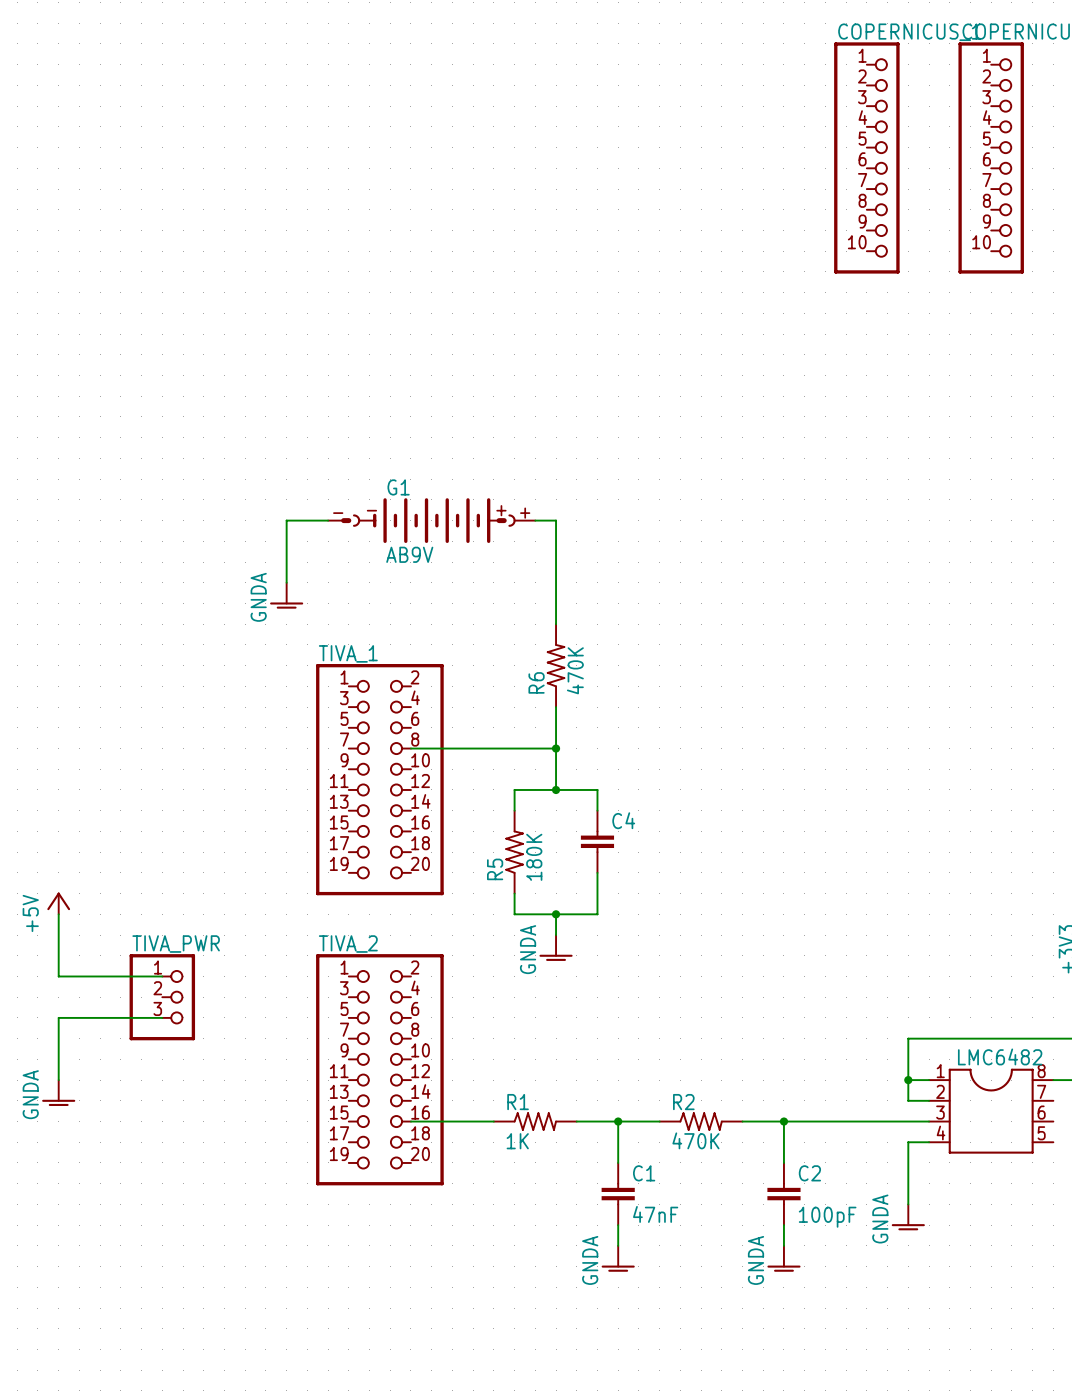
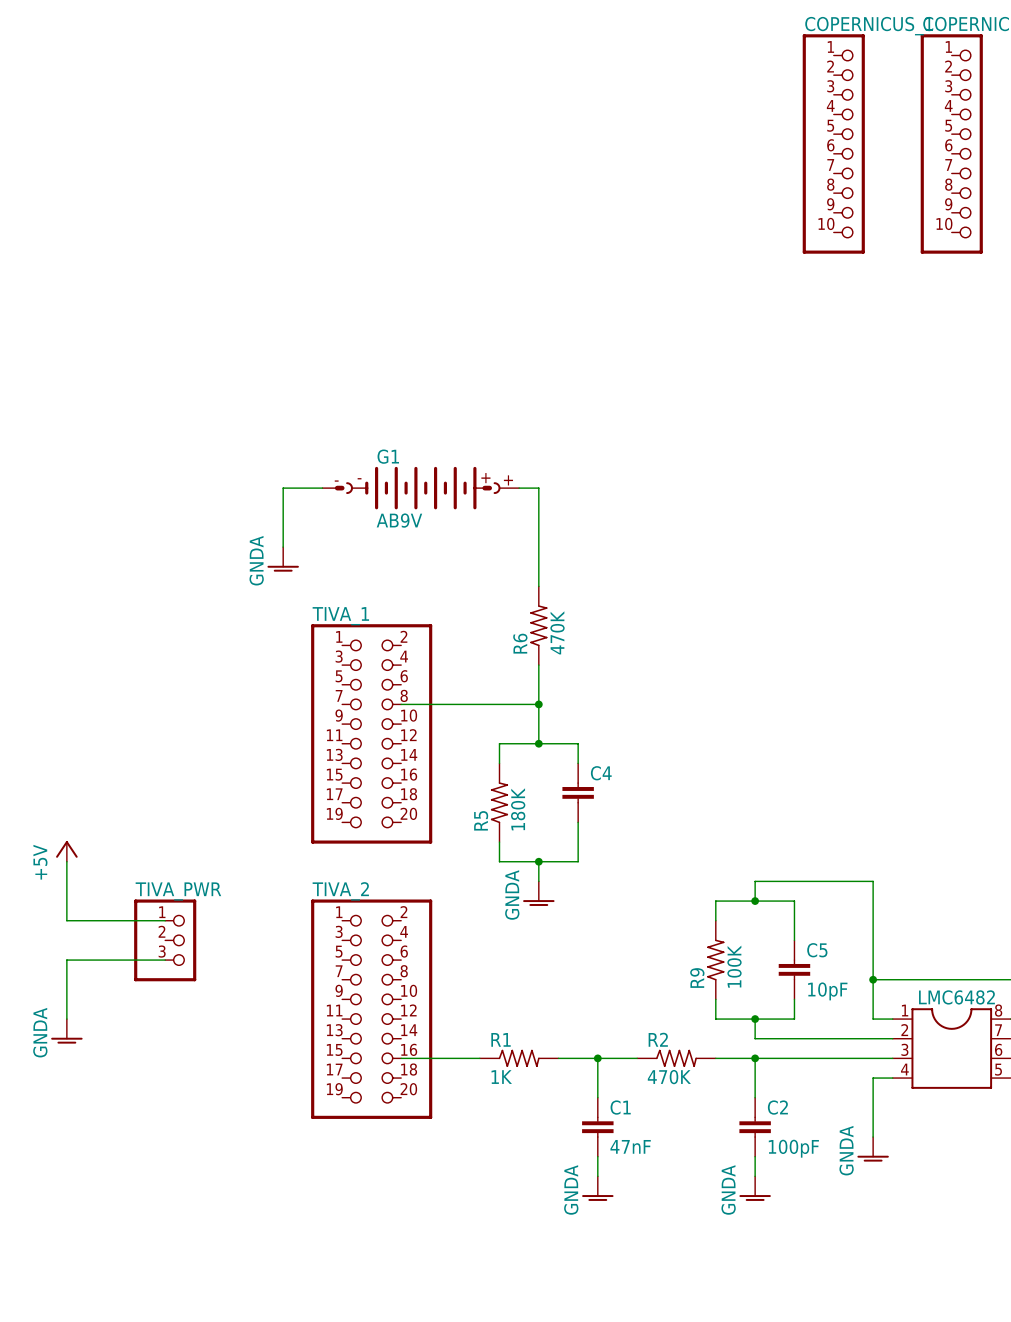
wire: none -> (755, 901) (755, 881) (873, 881) (873, 979)
junction: none -> (755, 901)
wire: none -> (715, 920) (715, 901) (794, 901) (794, 940)
R9: none -> 100K (715, 960)
C5: none -> 10pF (794, 969)
wire: none -> (715, 999) (715, 1019) (794, 1019) (794, 999)
junction: none -> (755, 1019)
wire: (908, 1080) (908, 1100) -> (755, 1019) (755, 1038) (873, 1038)
junction position: (908, 1080) -> (873, 979)

